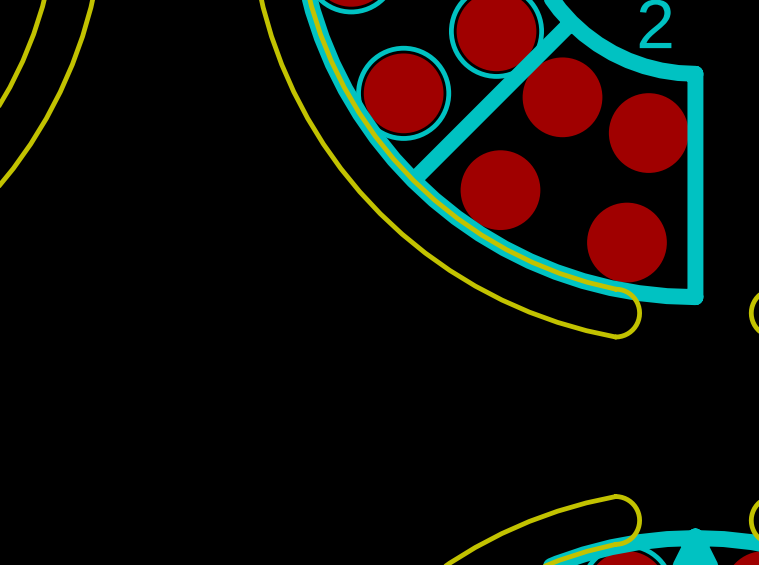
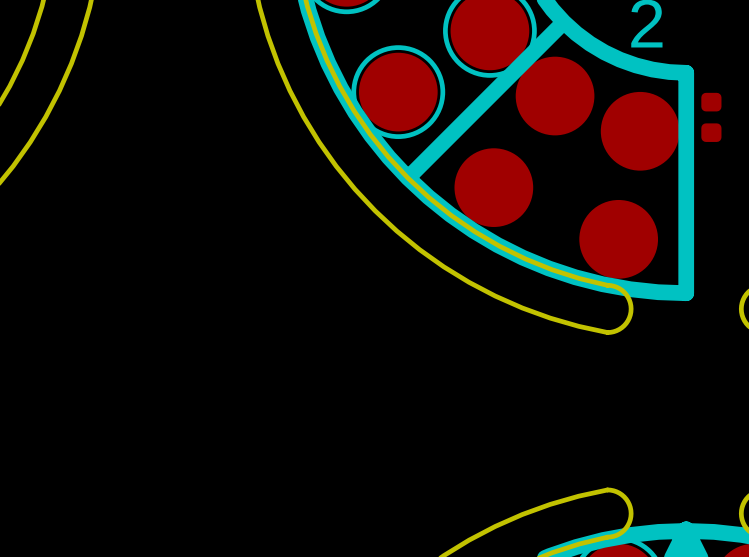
part: none -> (711, 117)

